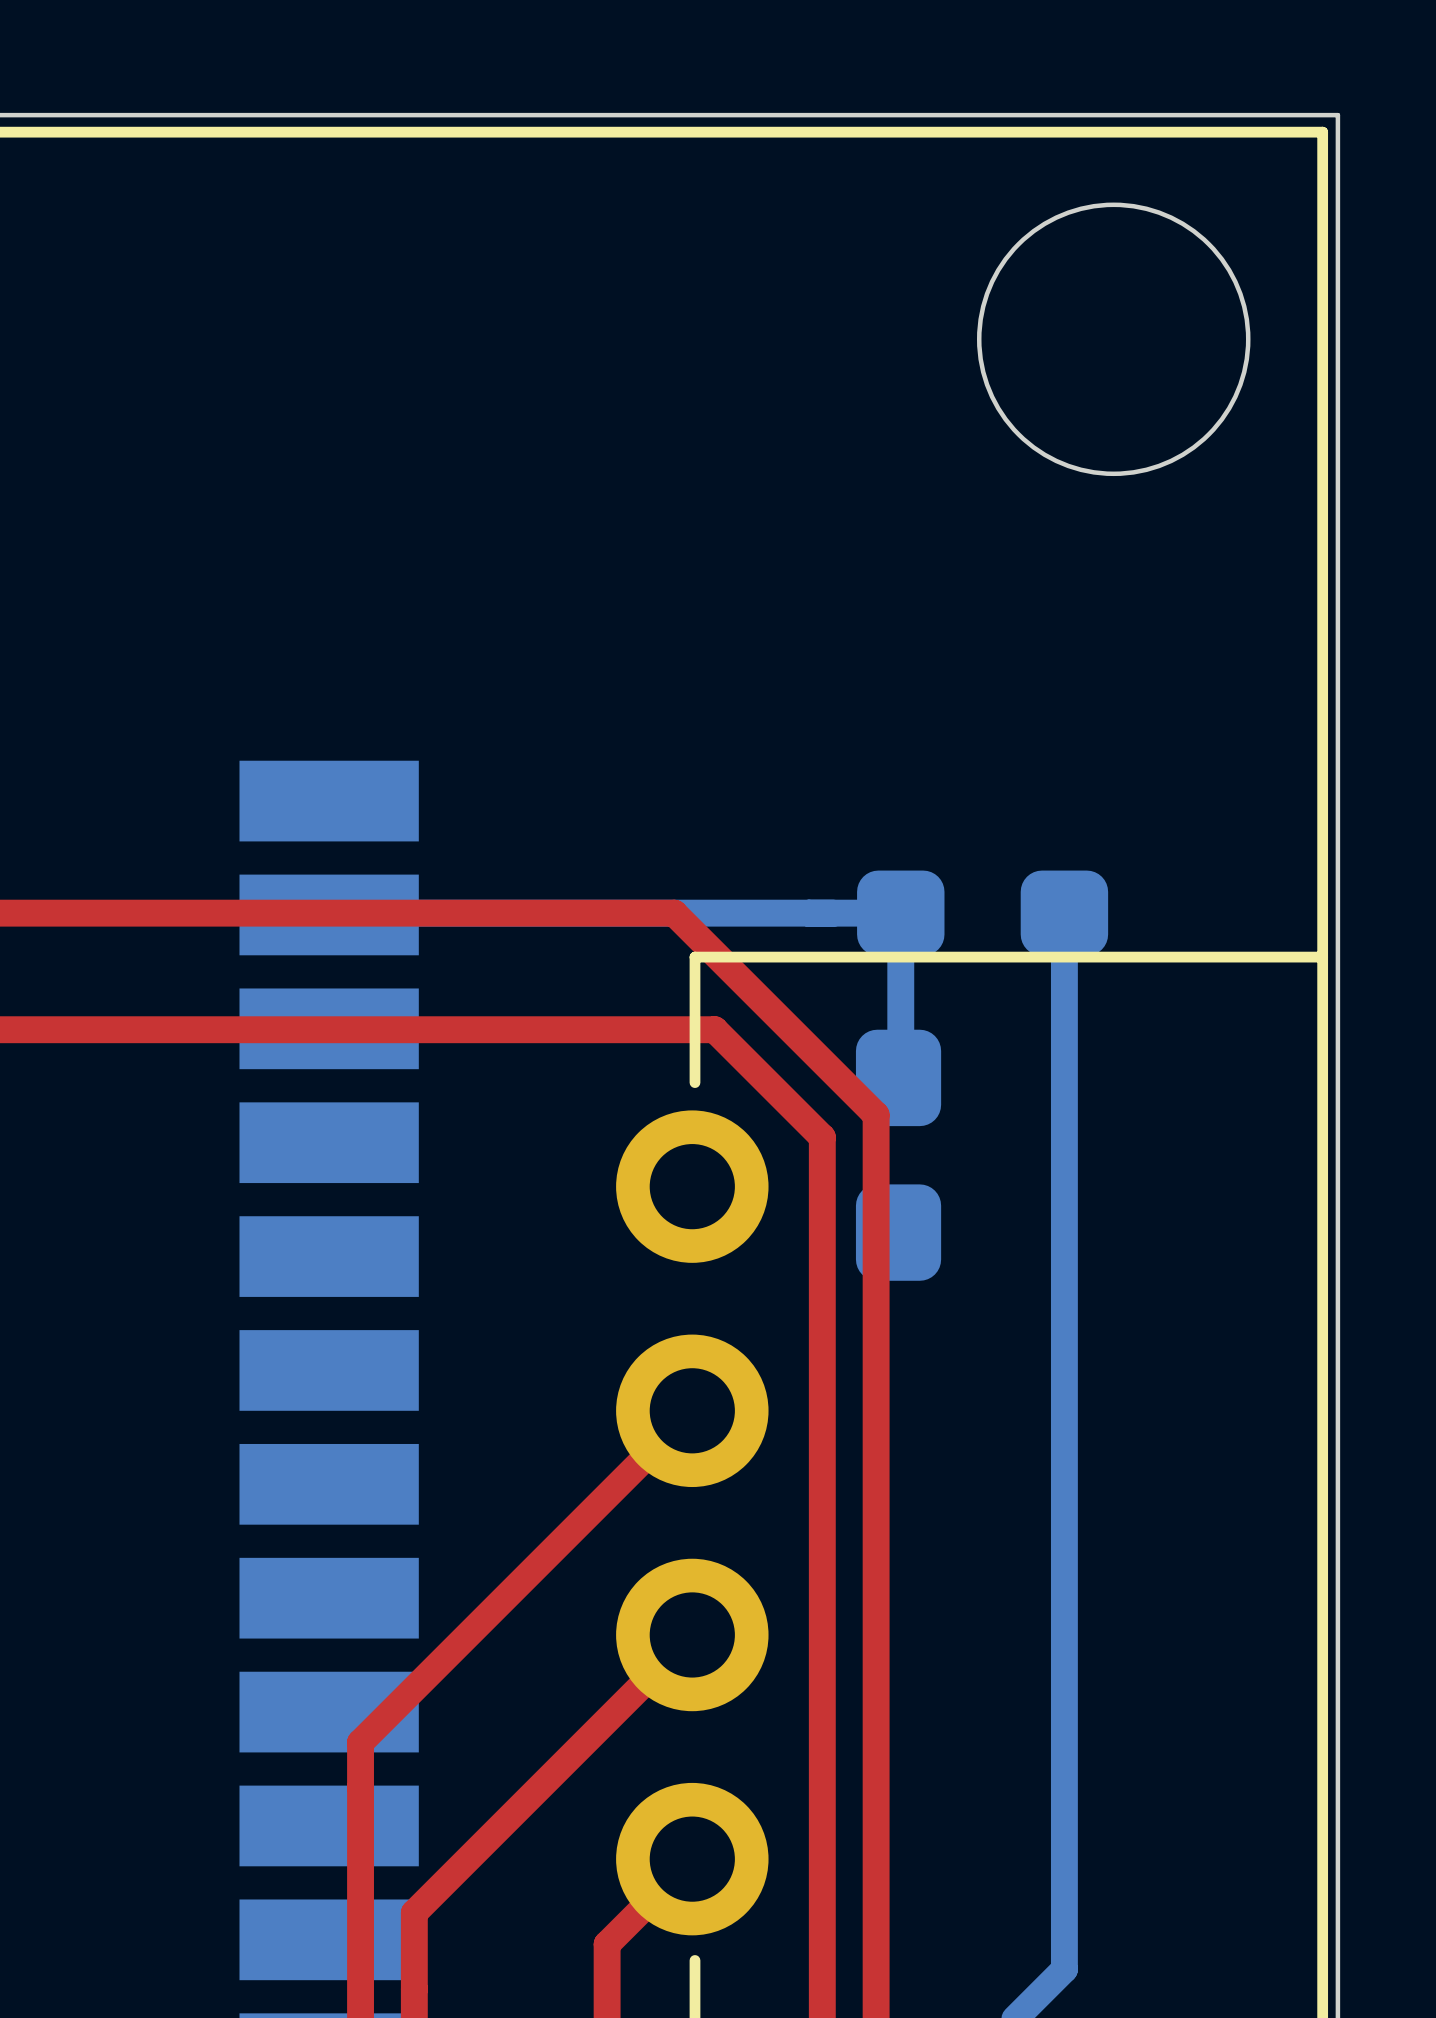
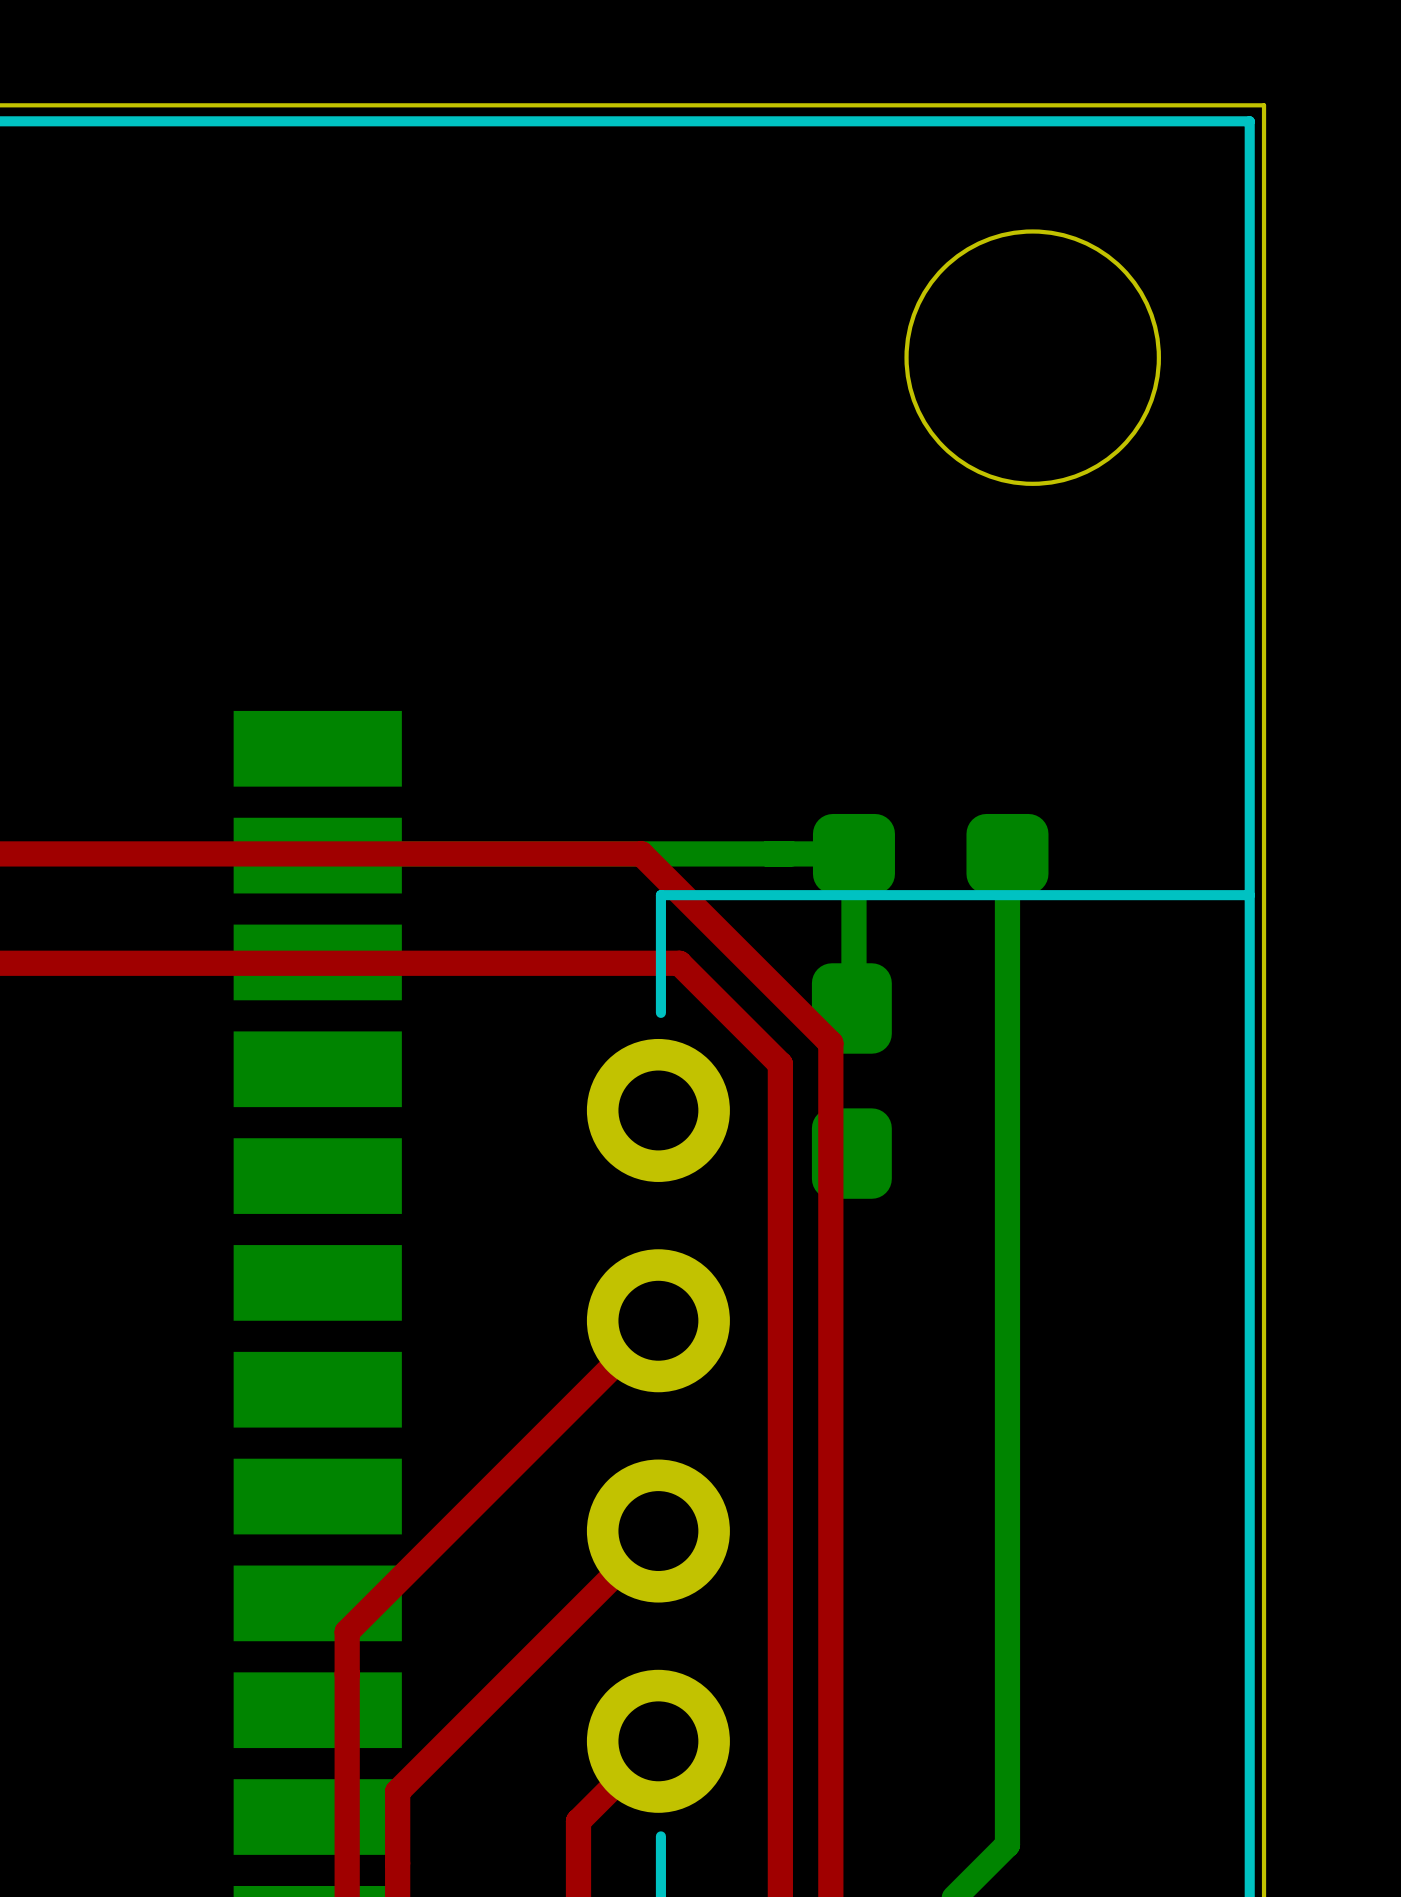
round board edge position: (1113, 339) -> (1032, 357)

